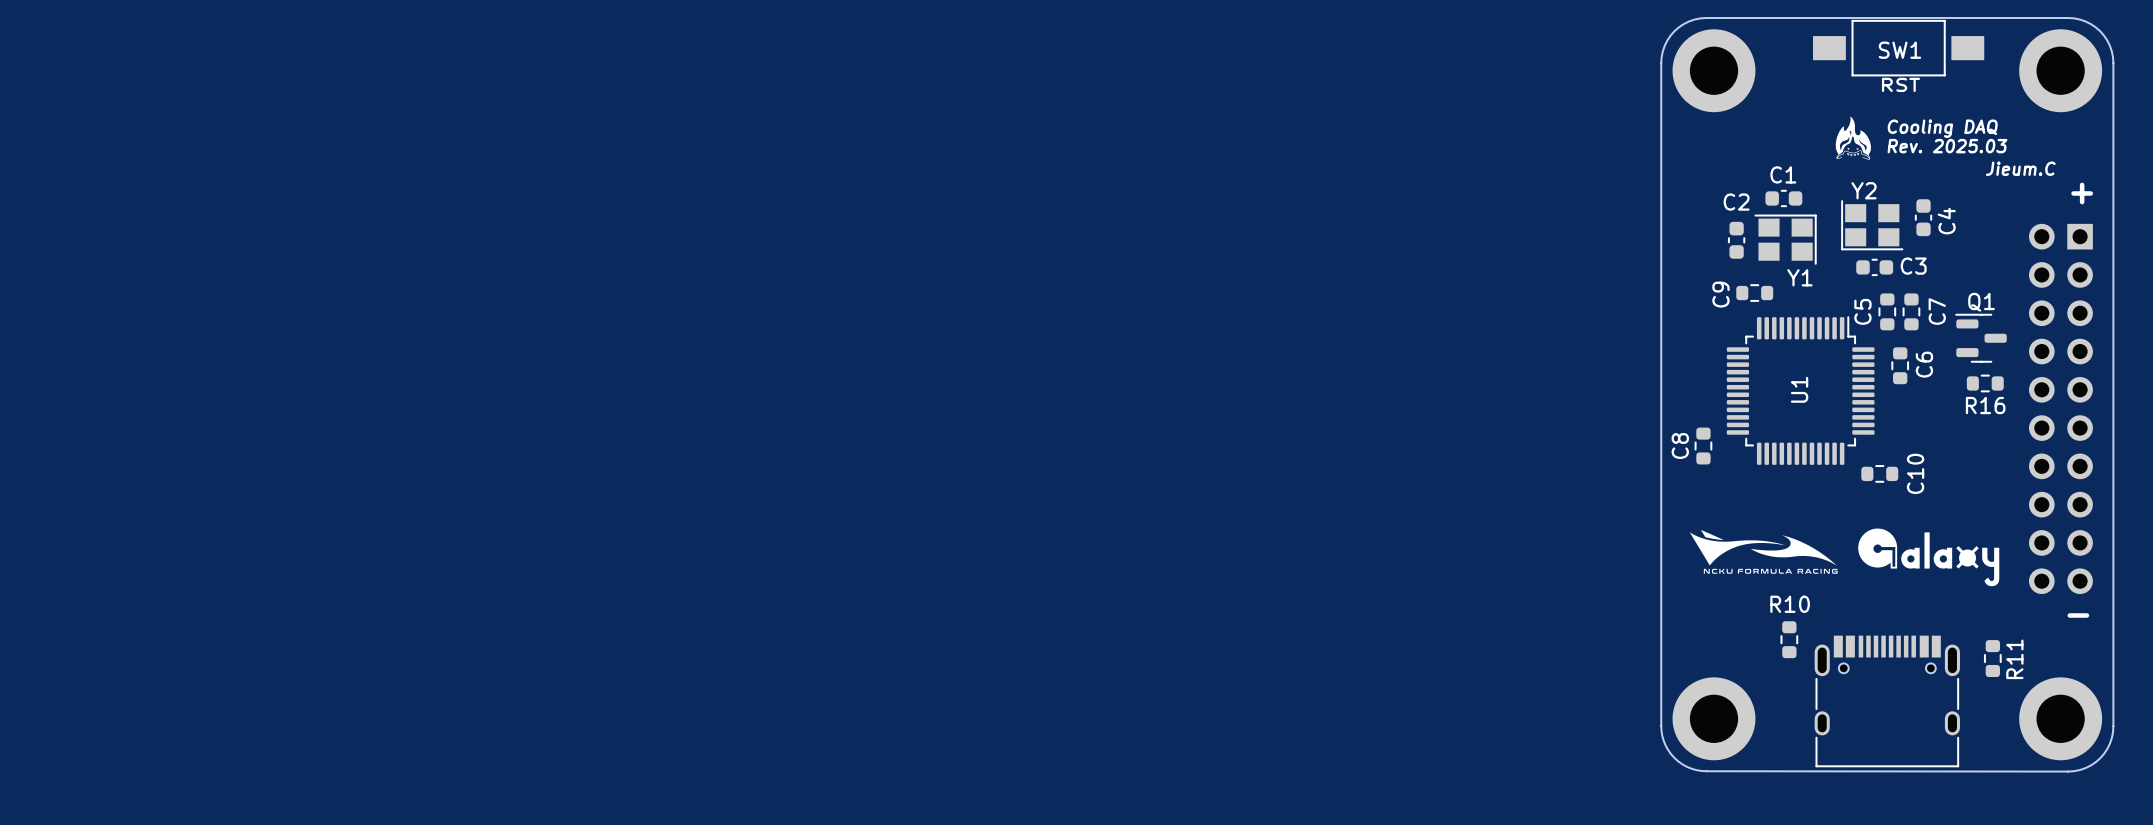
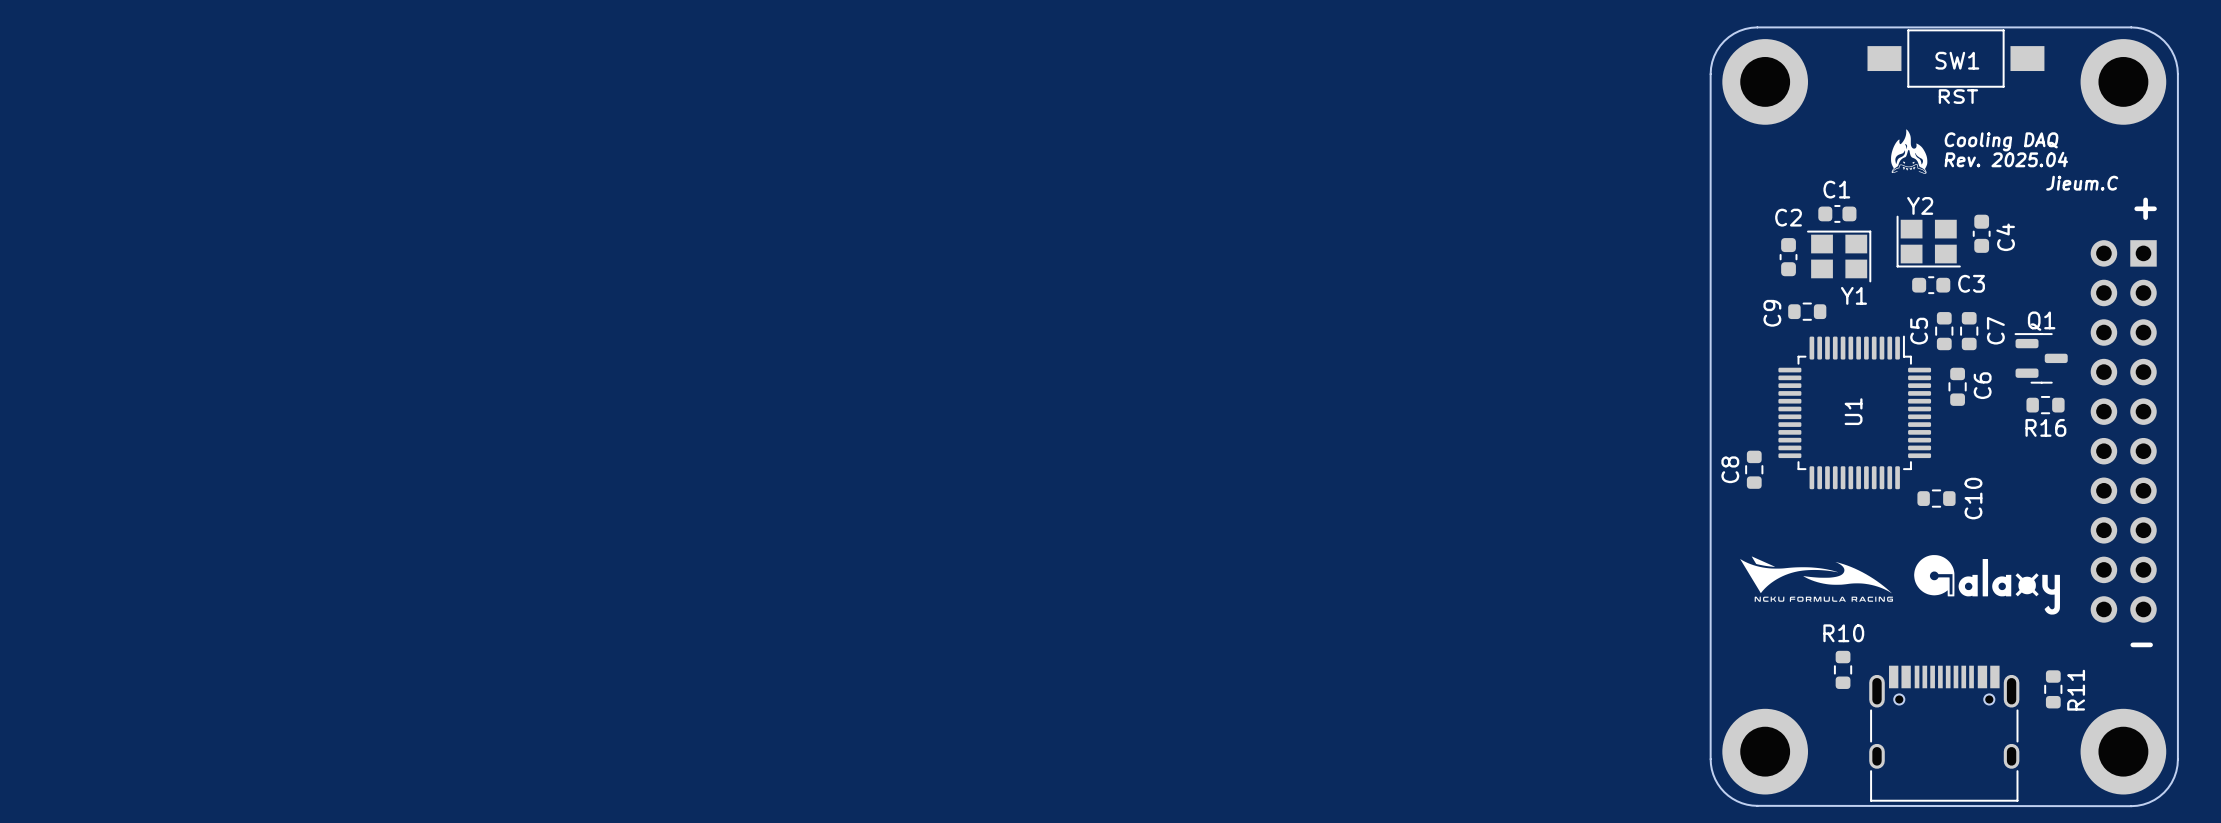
text: Rev. 2025.03 (1947, 146) -> Rev. 2025.04 (2006, 159)

